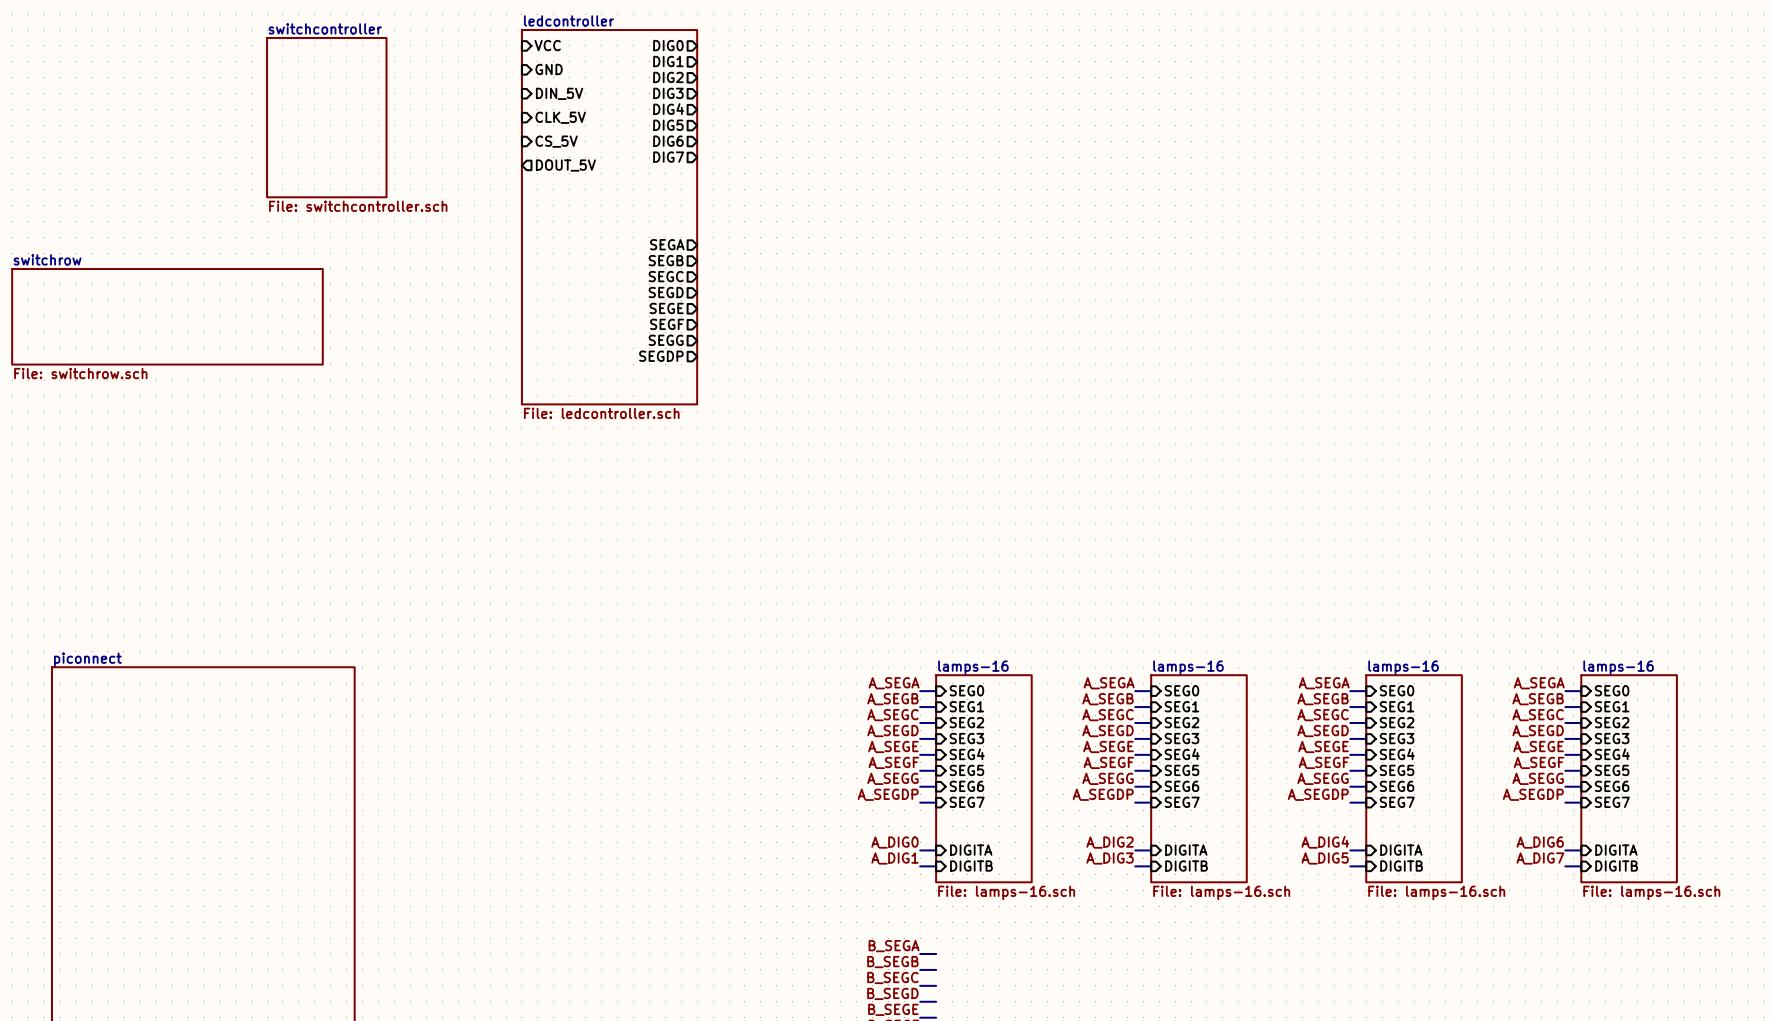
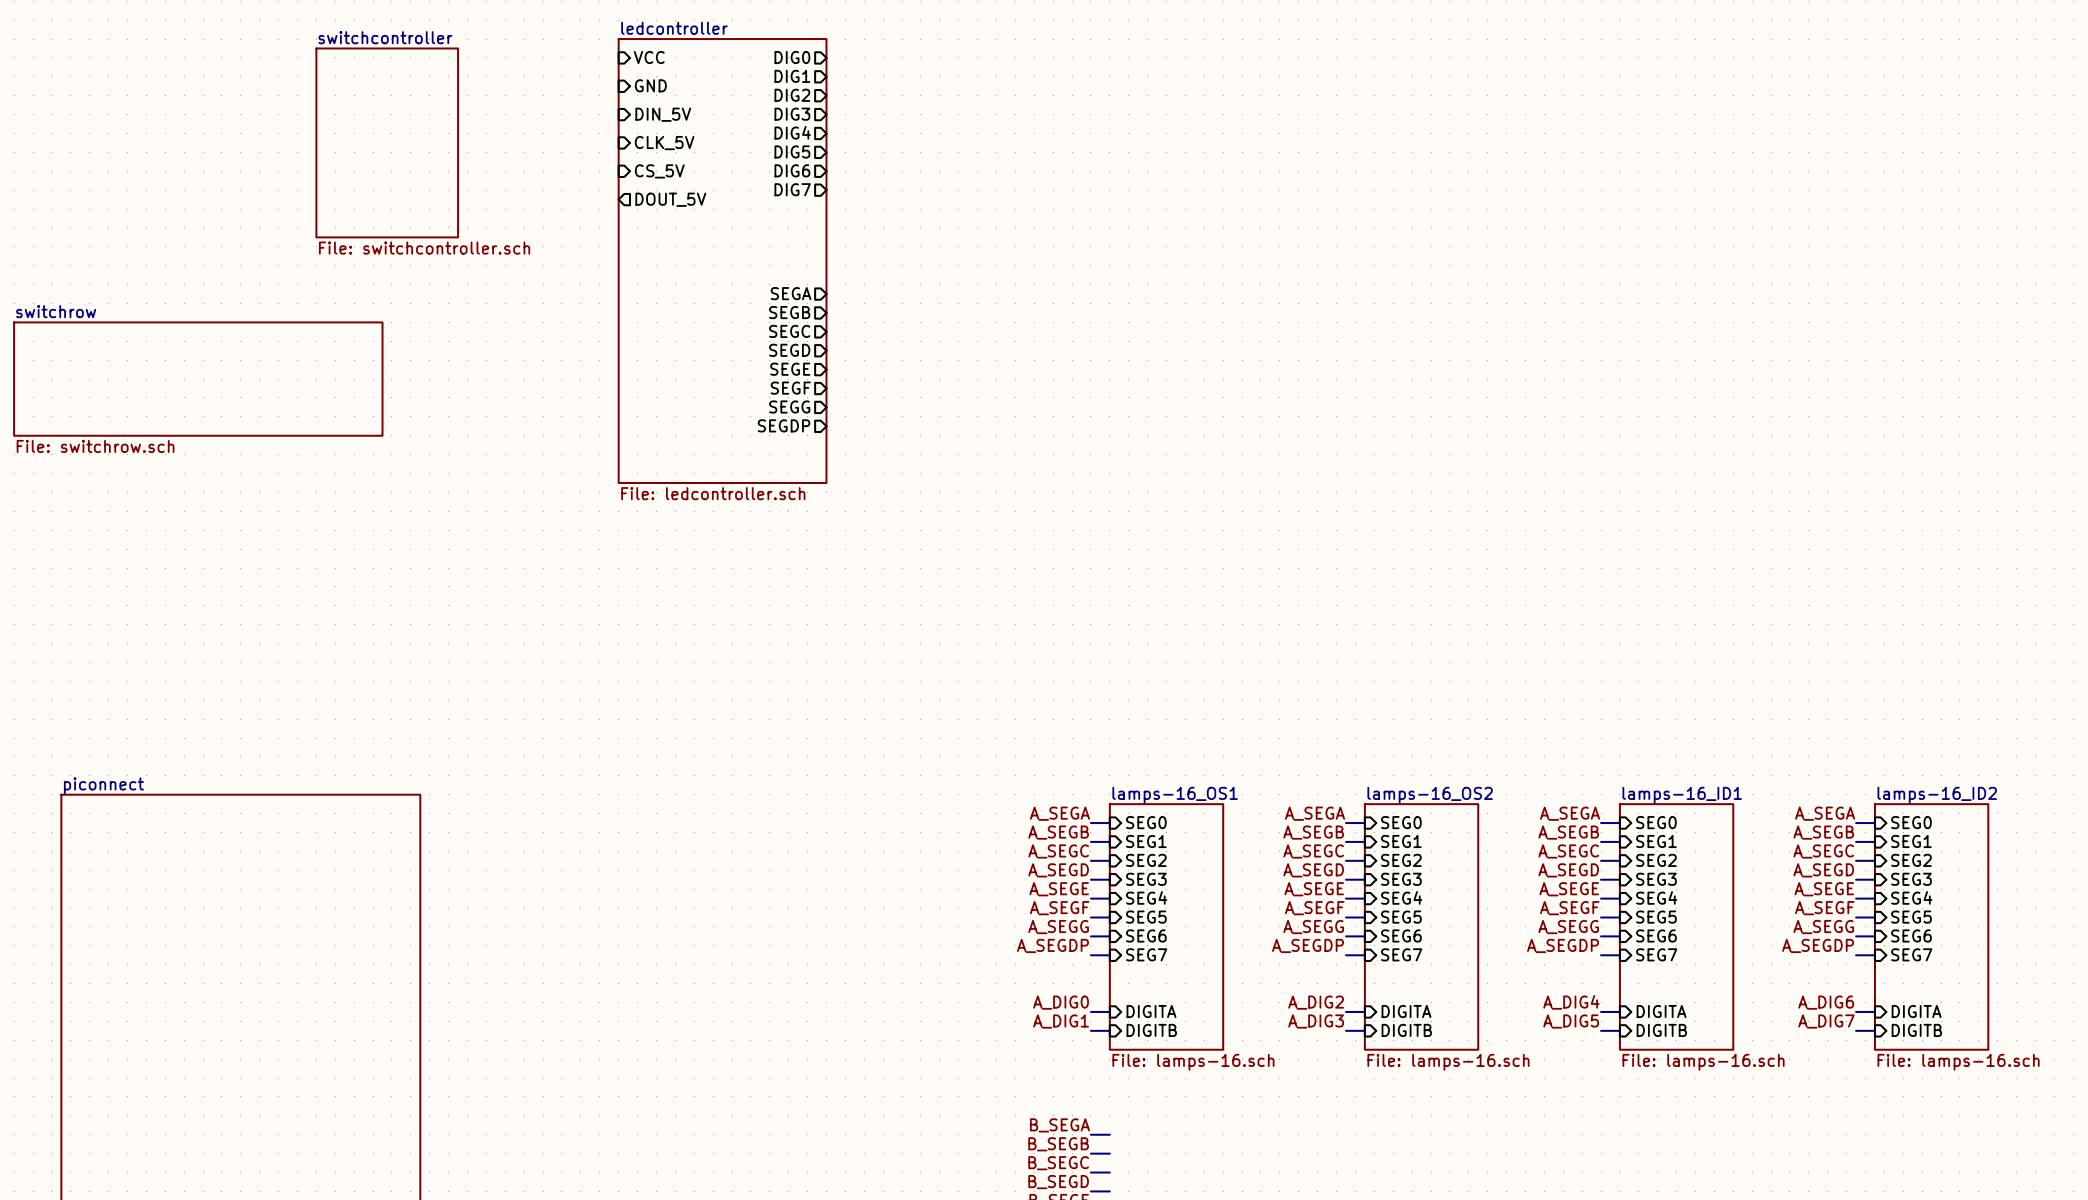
sheet lamps-16 name: lamps-16 (973, 667) -> lamps-16_OS1 (1175, 795)
sheet lamps-16 name: lamps-16 (1188, 667) -> lamps-16_OS2 (1430, 795)
sheet lamps-16 name: lamps-16 (1403, 667) -> lamps-16_ID1 (1682, 795)
sheet lamps-16 name: lamps-16 (1618, 667) -> lamps-16_ID2 (1937, 795)

